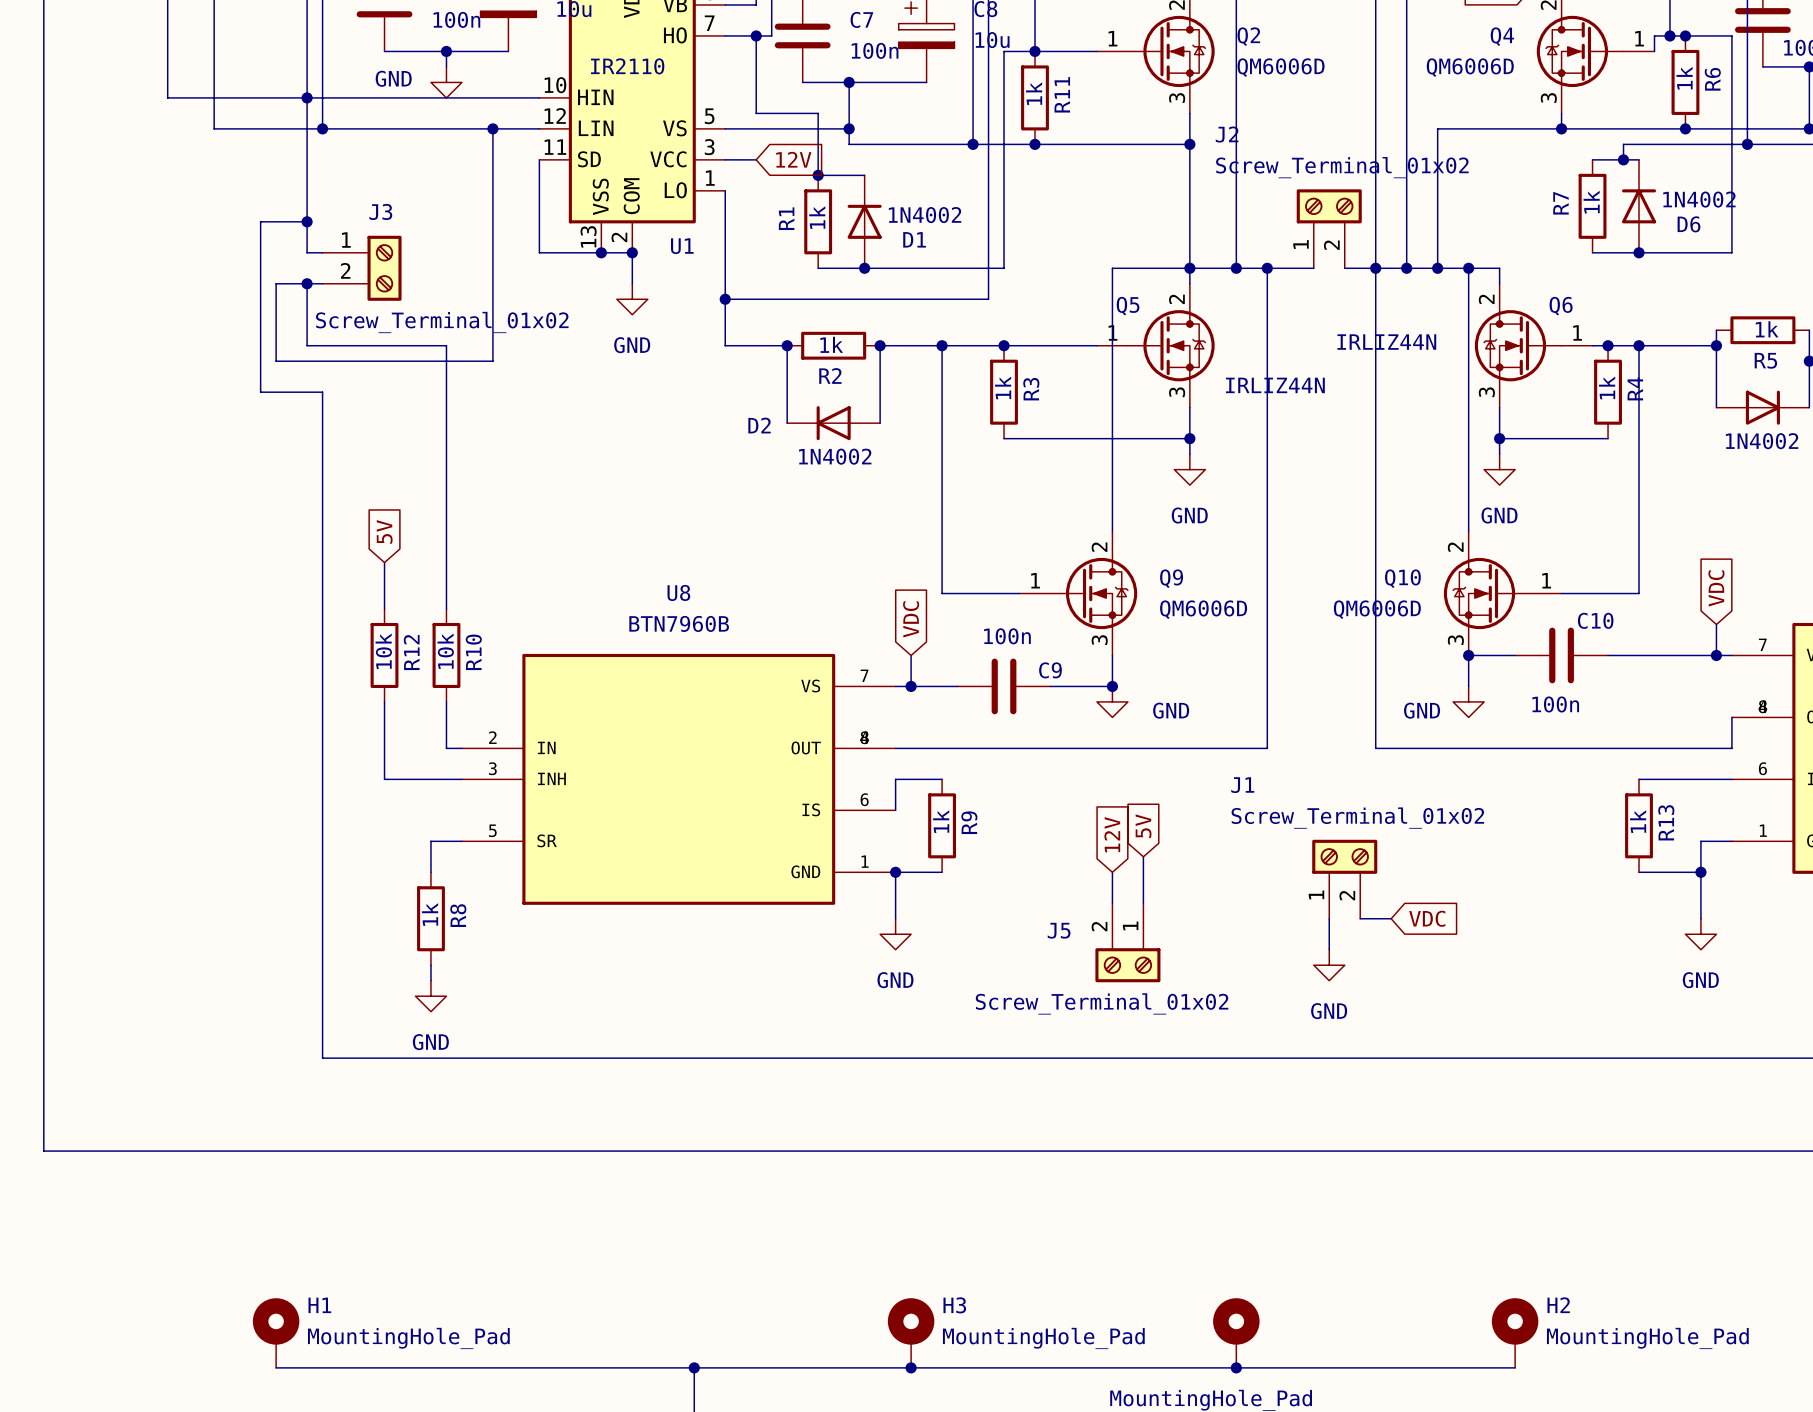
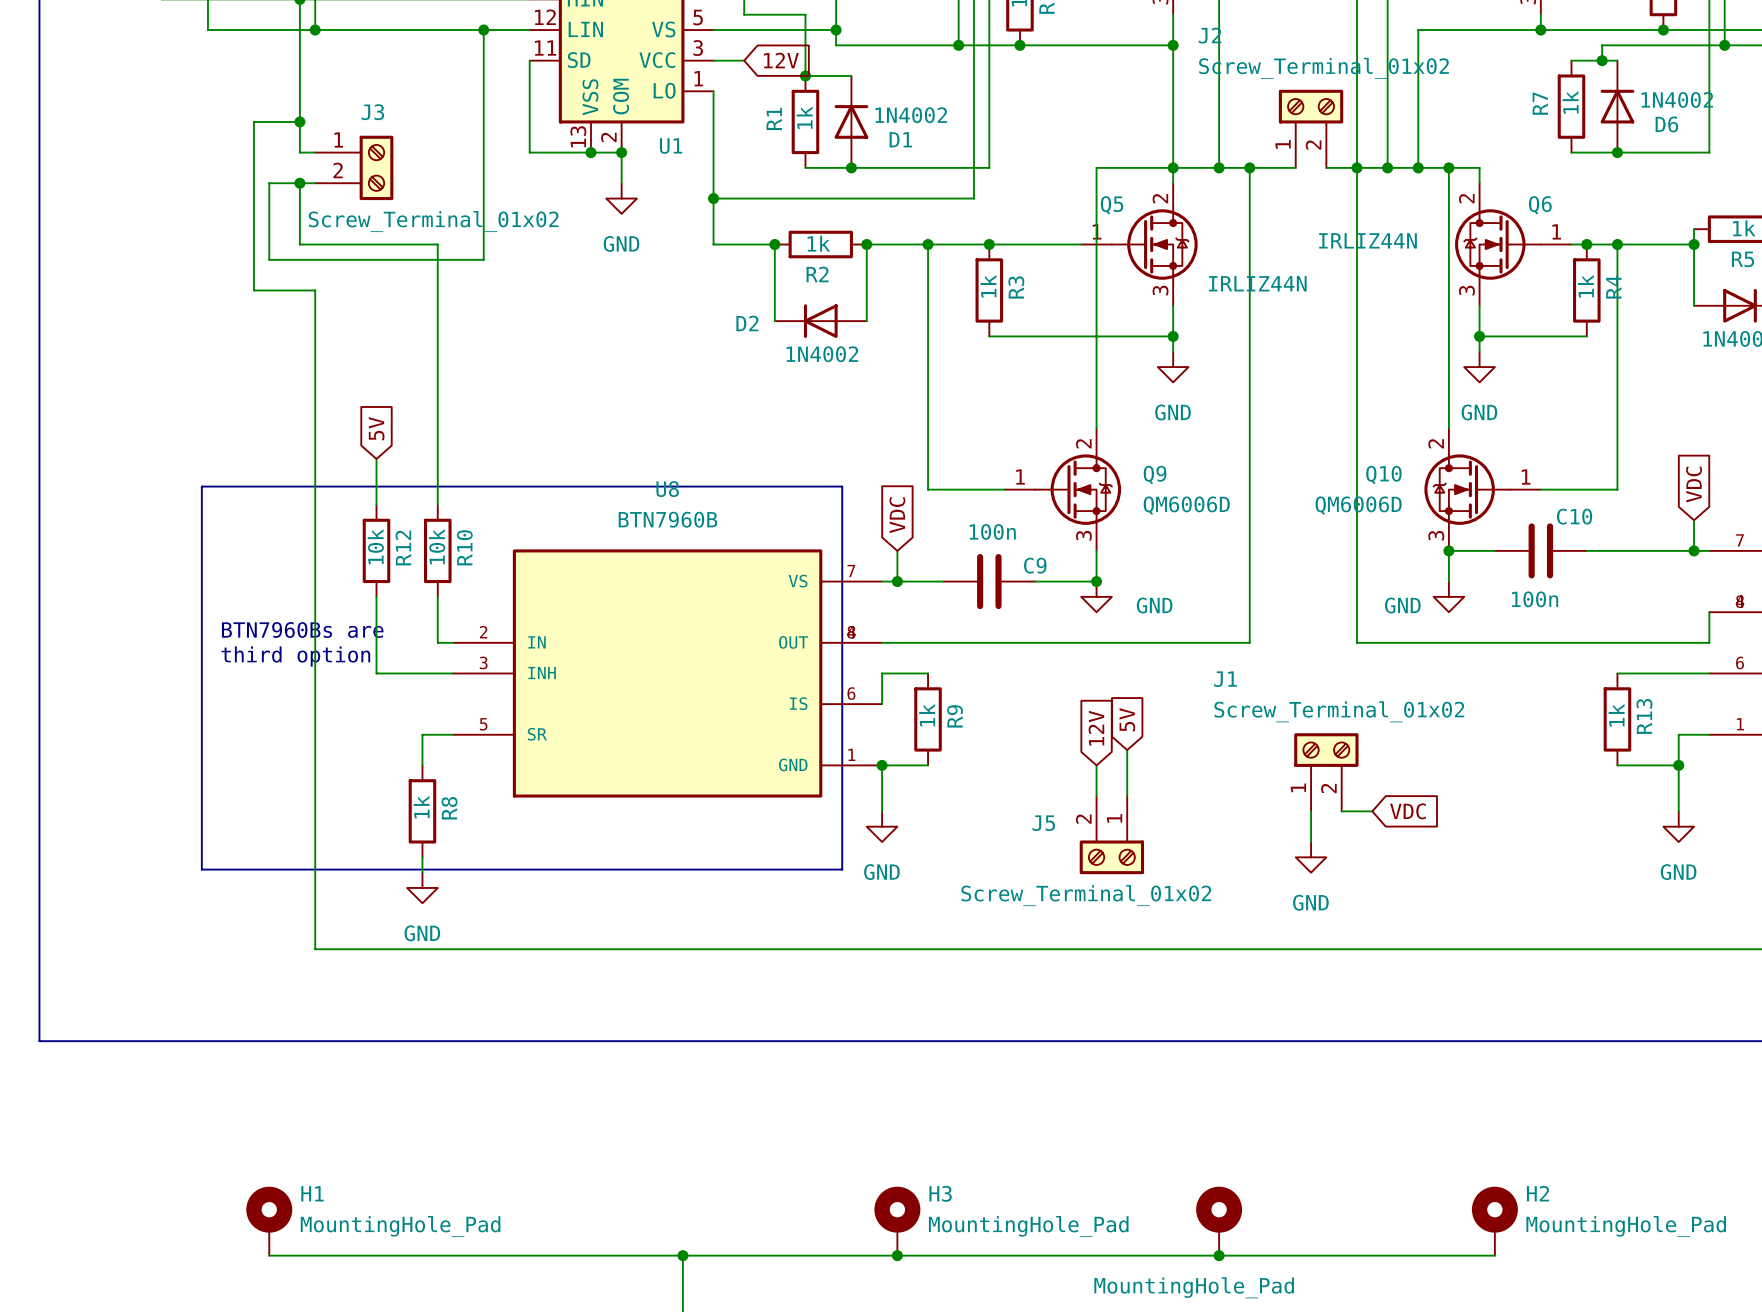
line: none -> (201, 486) (842, 486) (842, 869) (201, 869) (201, 486)
text: none -> BTN7960Bs are (302, 629)
text: none -> third option (295, 656)

